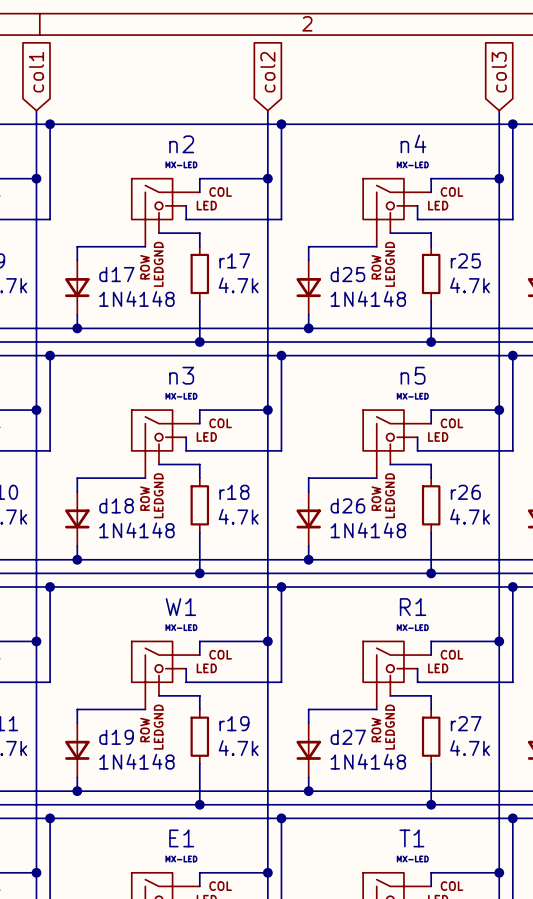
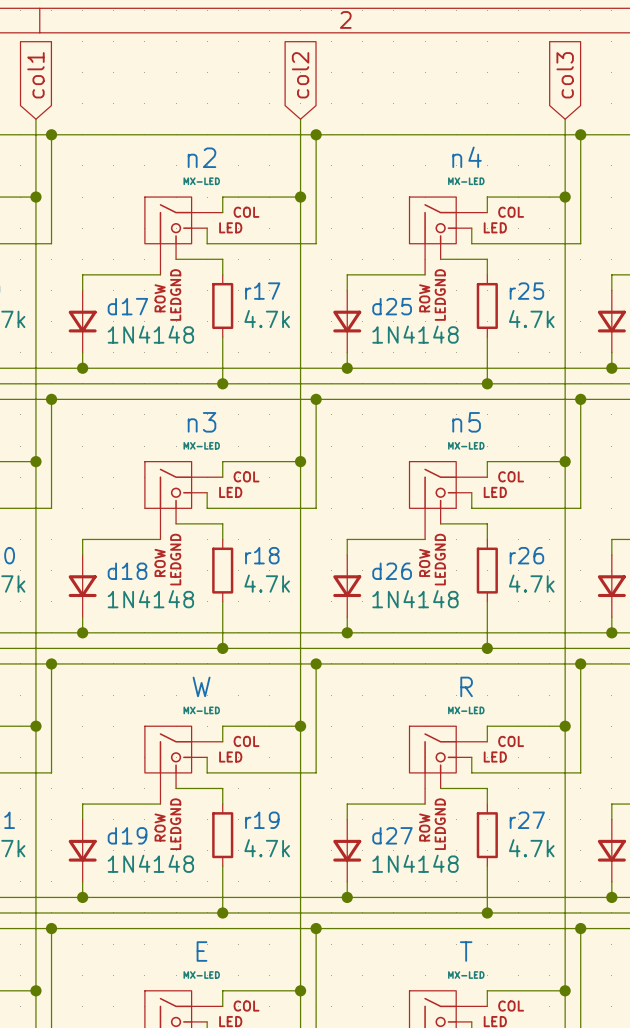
W1 name: W1 (180, 607) -> W (201, 686)
R1 name: R1 (413, 607) -> R (466, 686)
E1 name: E1 (181, 838) -> E (202, 951)
T1 name: T1 (411, 838) -> T (466, 951)

